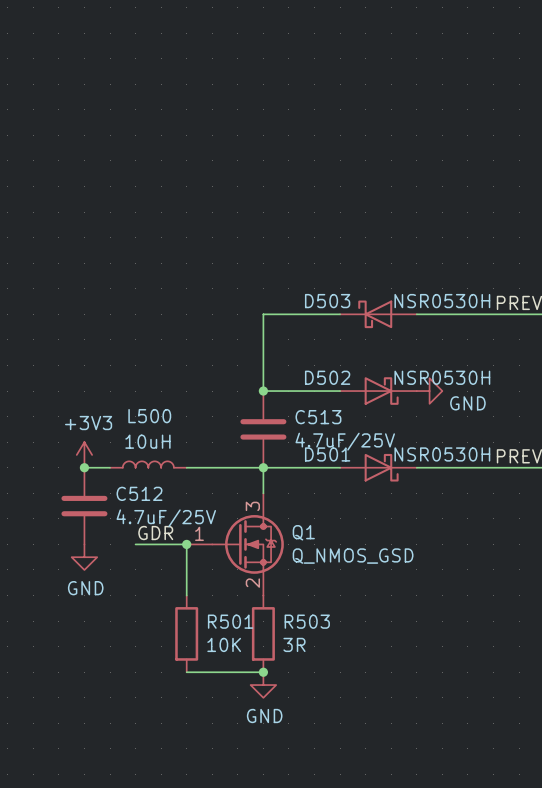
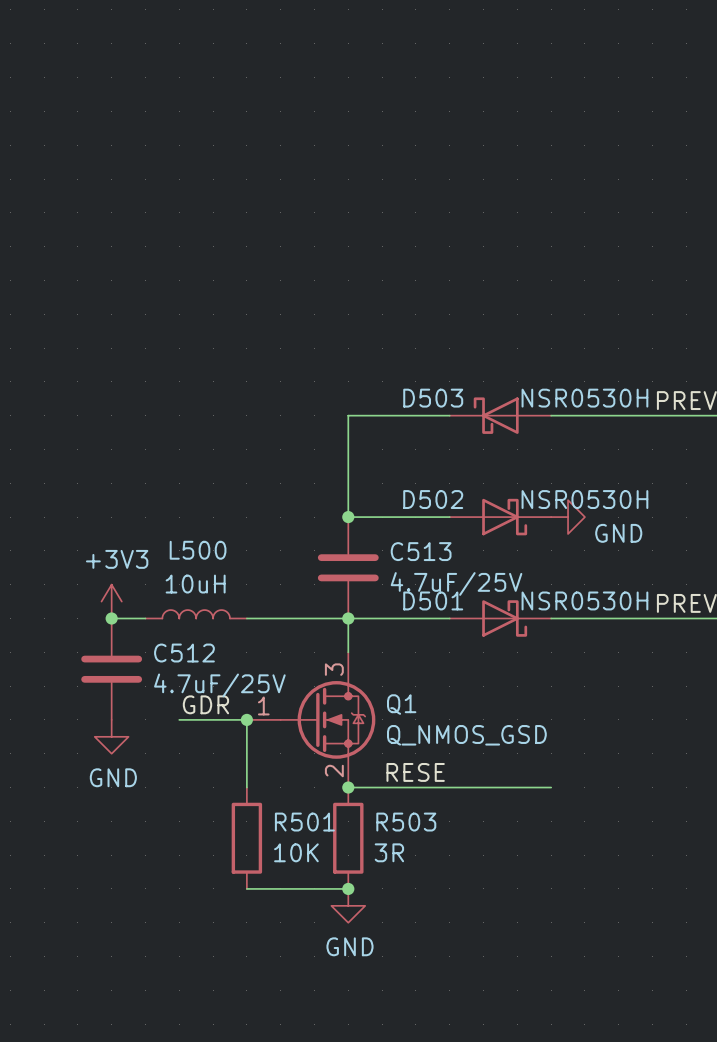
label: none -> RESE (415, 772)
wire: none -> (348, 787) (551, 787)
junction: none -> (348, 787)

